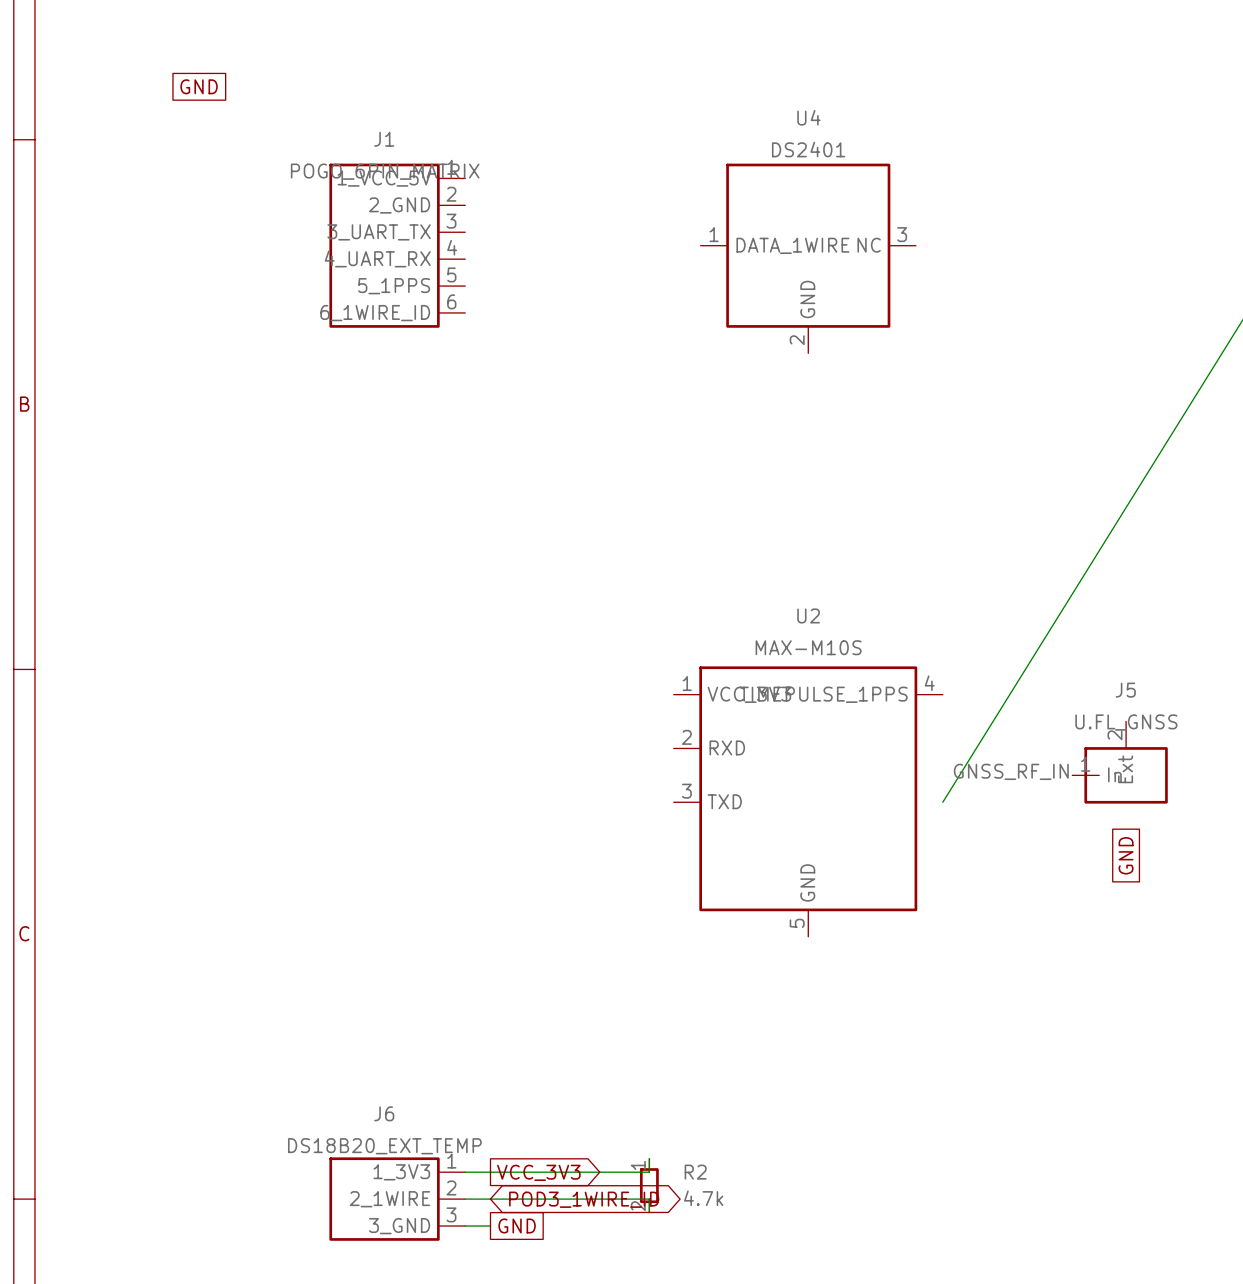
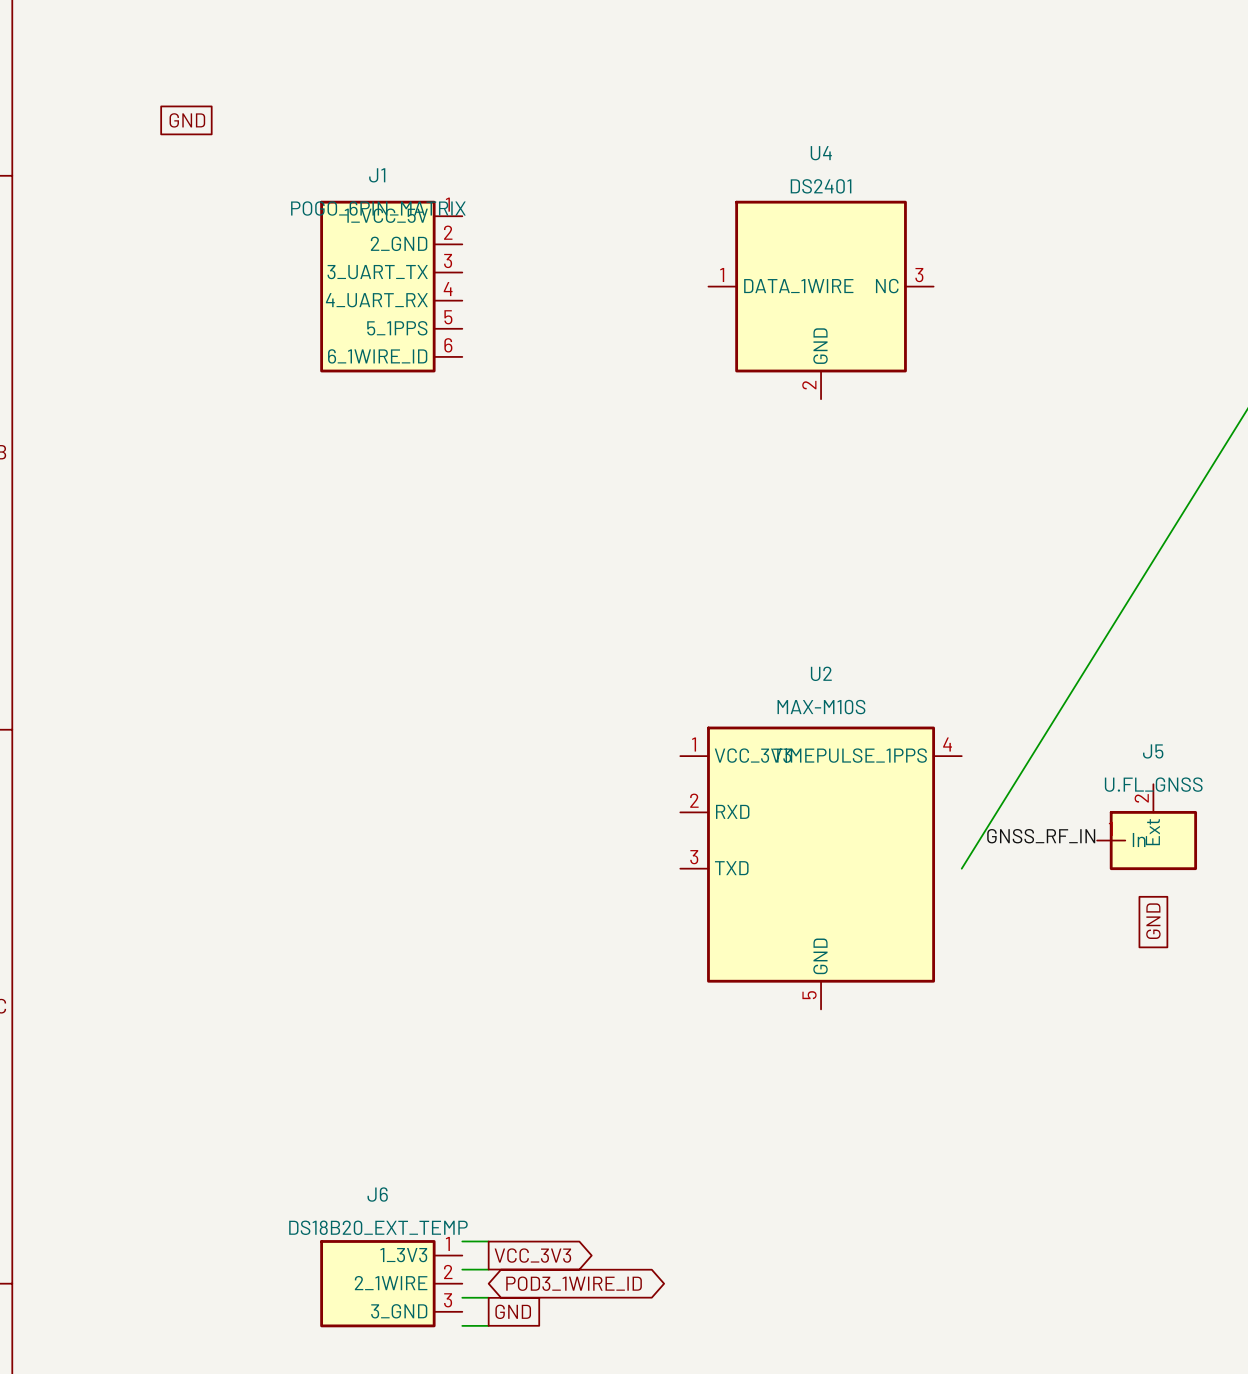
wire: none -> (462, 1241) (488, 1241)
wire: (649, 1158) (649, 1172) (465, 1172) -> none
wire: none -> (462, 1269) (488, 1269)
R2: 4.7k (649, 1185) -> none
wire: (465, 1199) (649, 1199) (649, 1212) -> none
wire: (465, 1226) (490, 1226) -> (462, 1297) (488, 1297)
wire: none -> (462, 1325) (488, 1325)

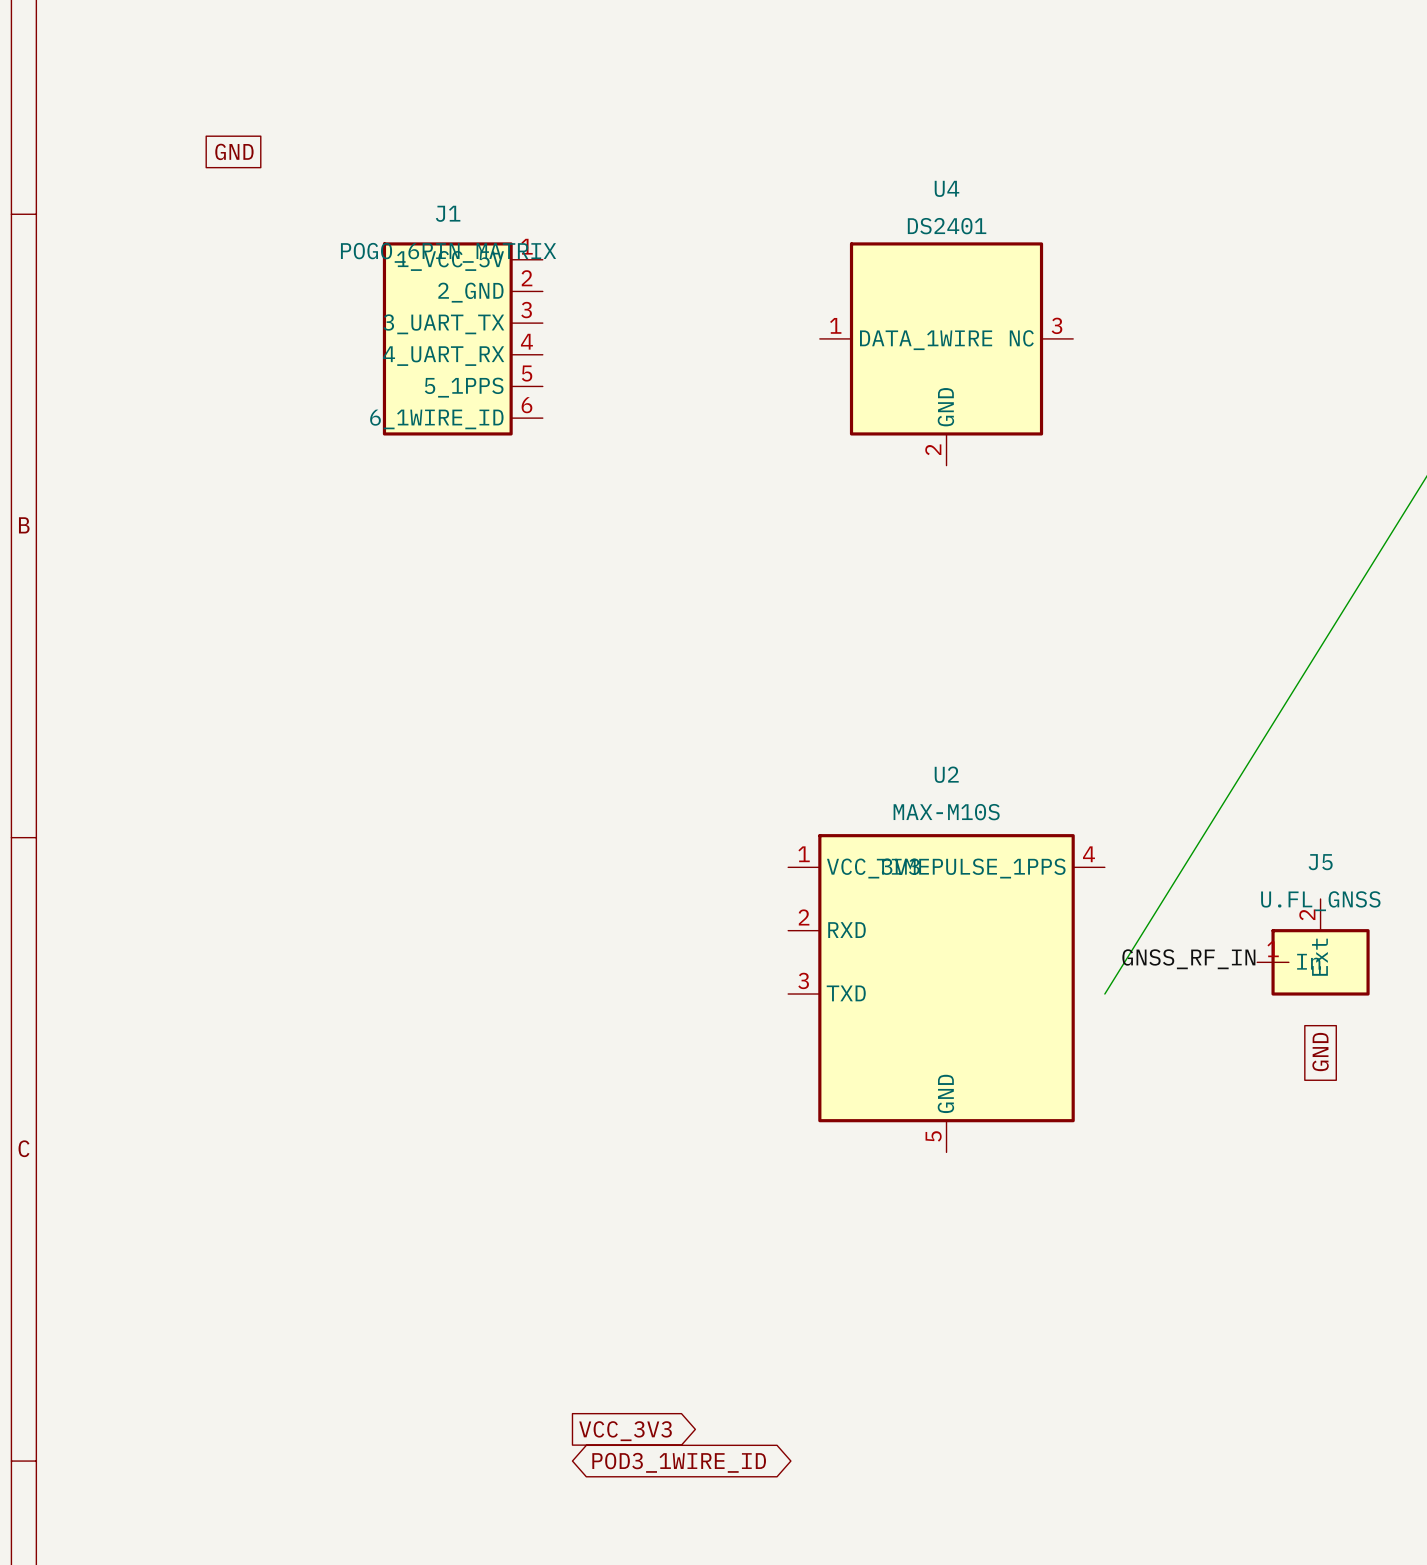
wire: (462, 1241) (488, 1241) -> none
wire: (462, 1269) (488, 1269) -> none
J6: DS18B20_EXT_TEMP (391, 1283) -> none
wire: (462, 1297) (488, 1297) -> none
global label: GND (513, 1311) -> none
wire: (462, 1325) (488, 1325) -> none

